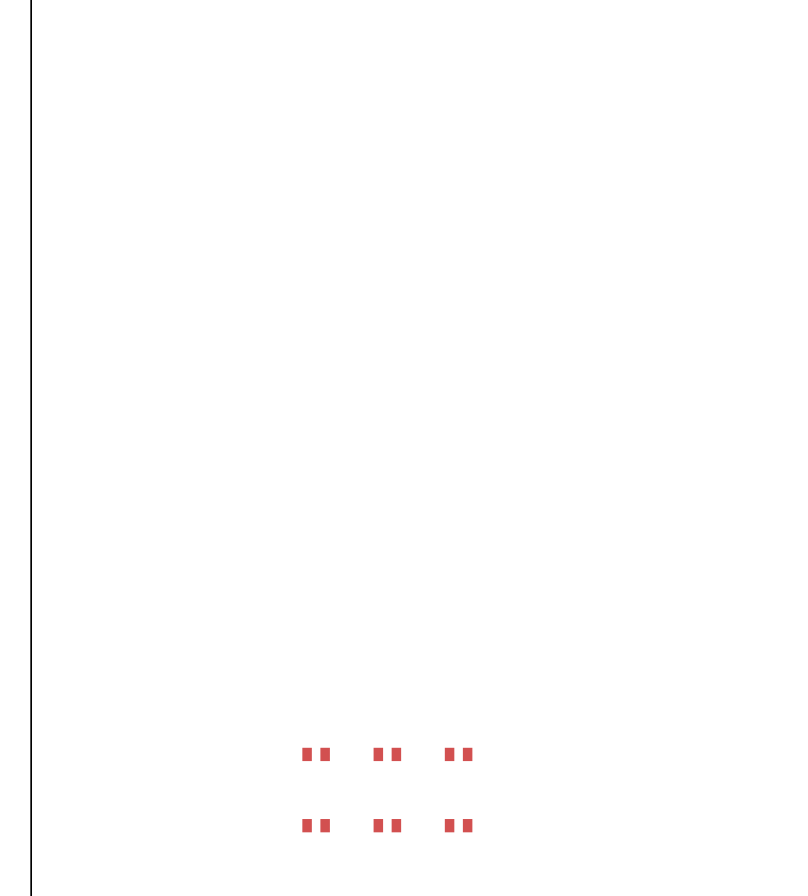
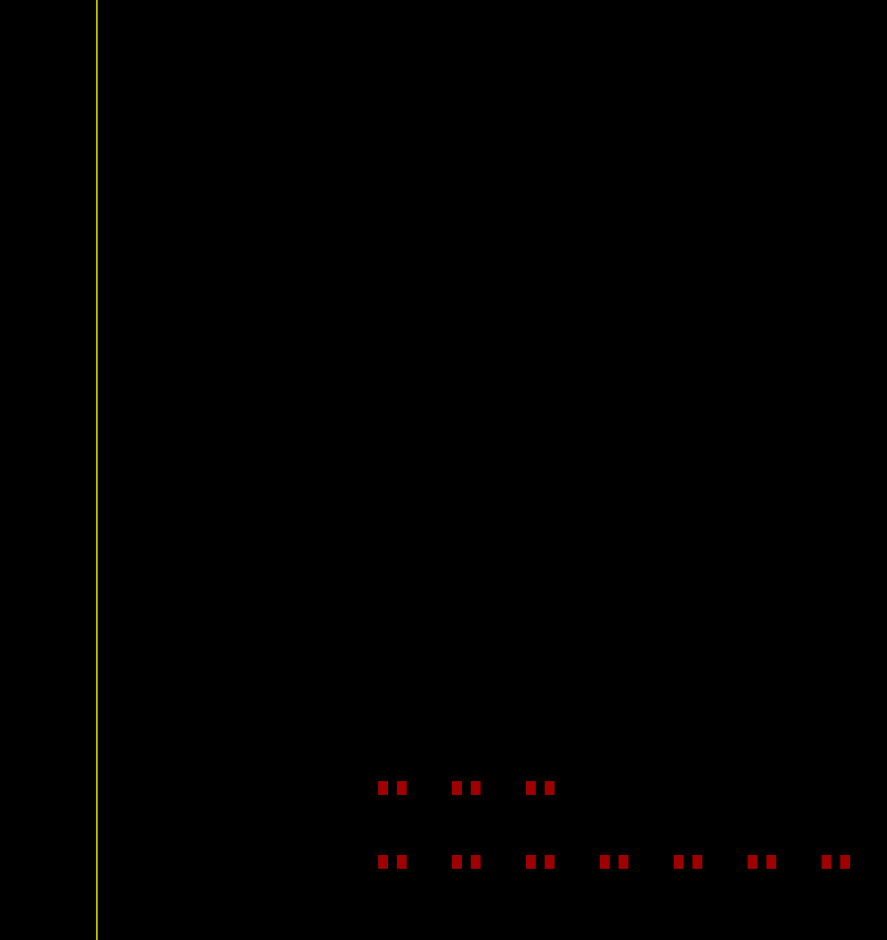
part: none -> (614, 861)
part: none -> (688, 861)
part: none -> (761, 861)
part: none -> (835, 861)

